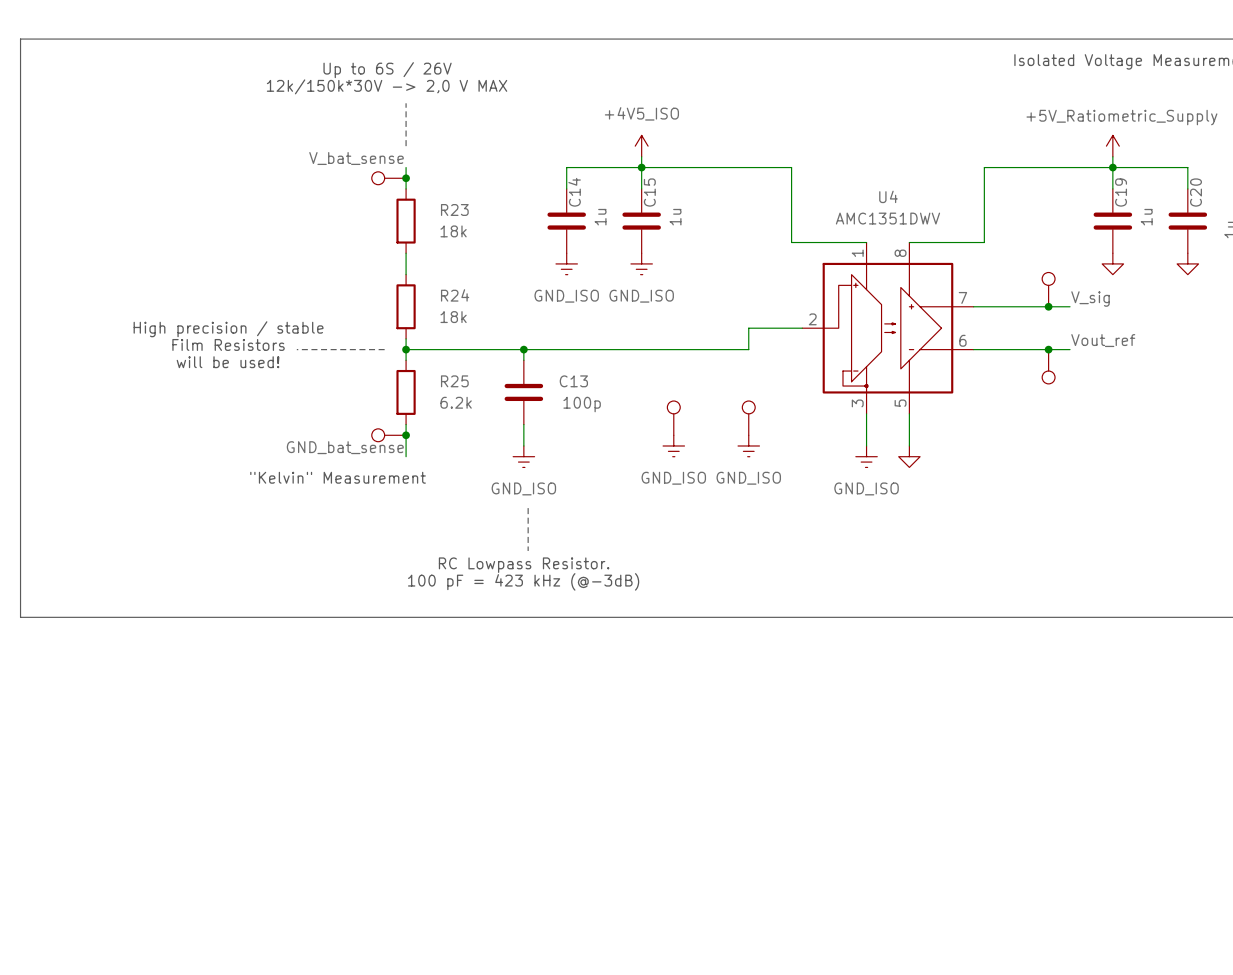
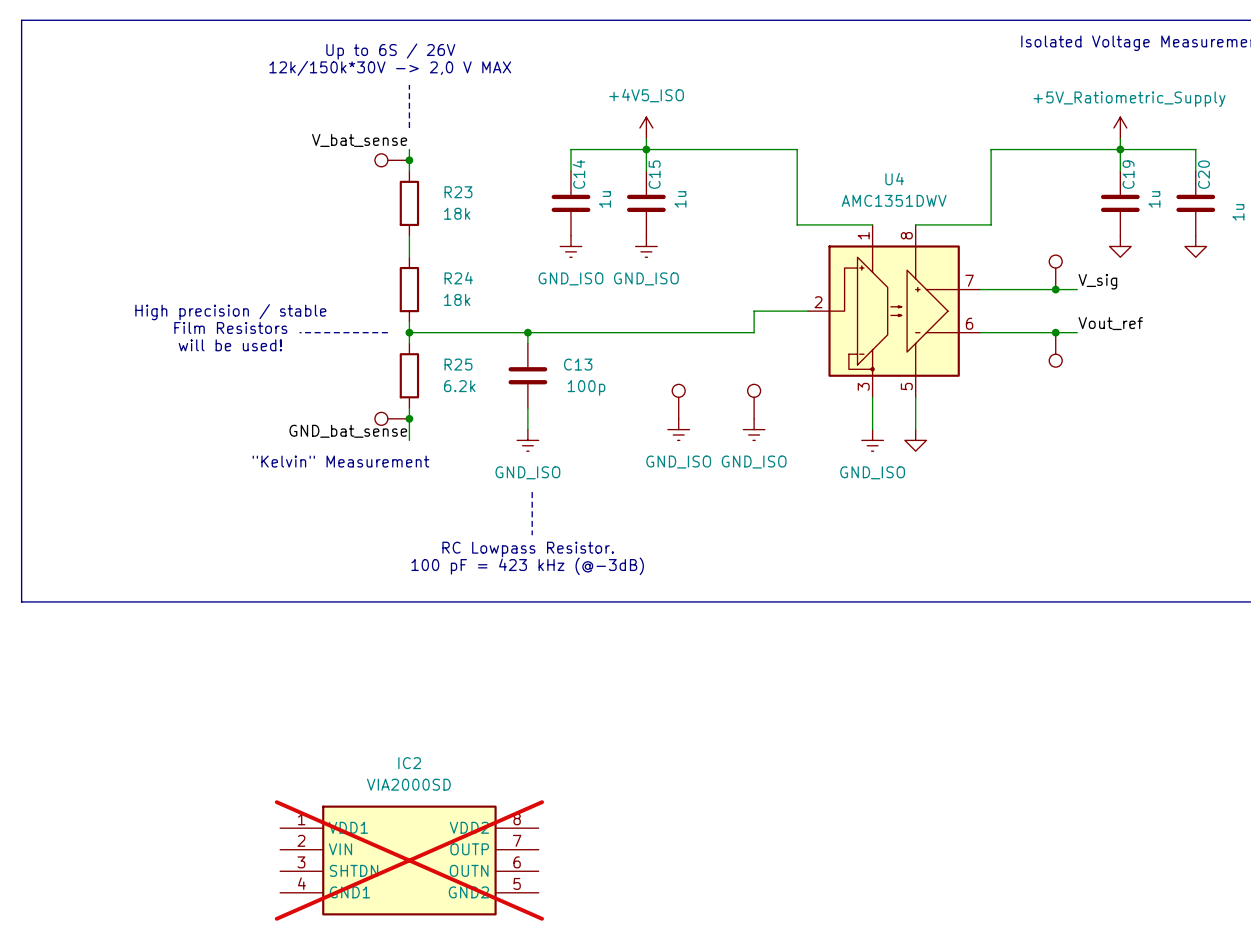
IC2: none -> VIA2000SD (409, 860)

